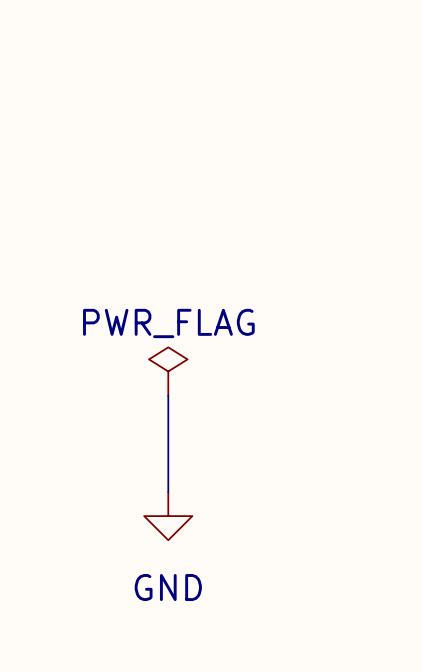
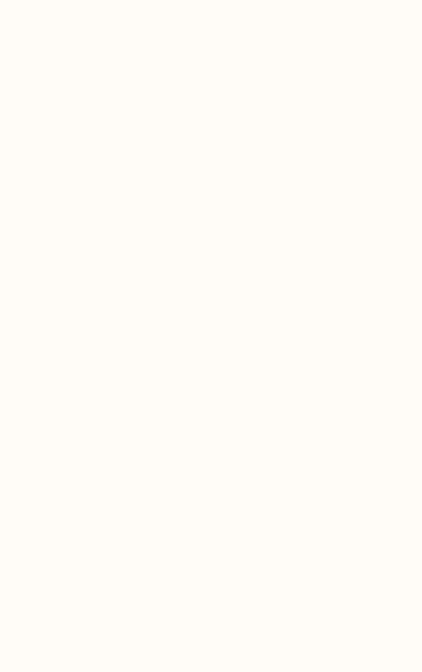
power symbol: PWR_FLAG (168, 371) -> none
wire: (168, 395) (168, 492) -> none
power symbol: GND (168, 516) -> none

